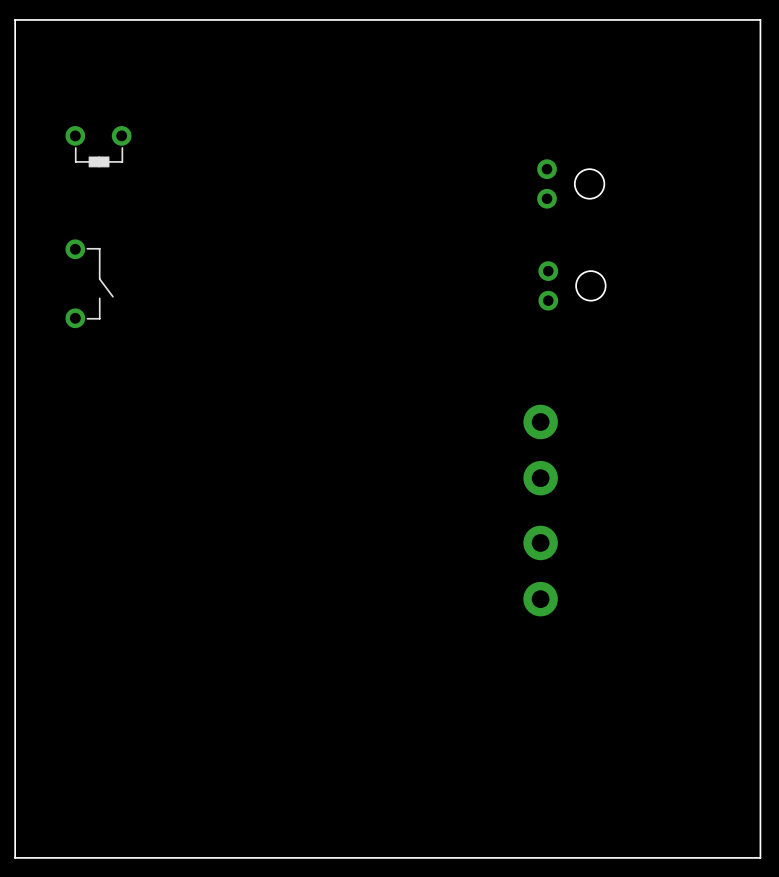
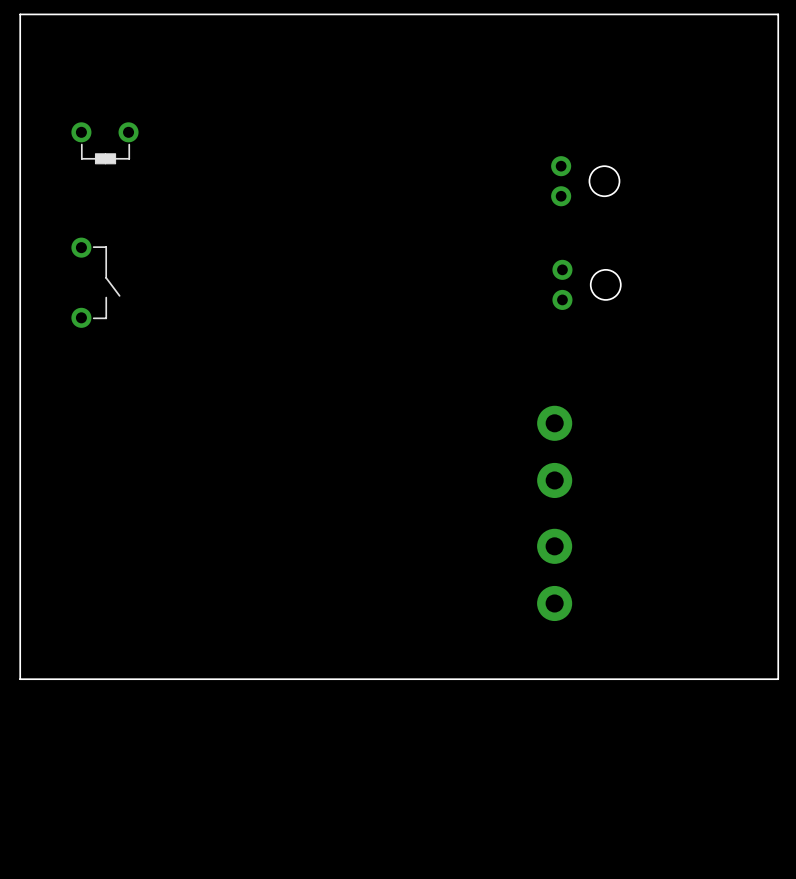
board edge: (760, 673) (760, 857) (15, 857) (15, 673) -> (778, 679) (20, 679)

